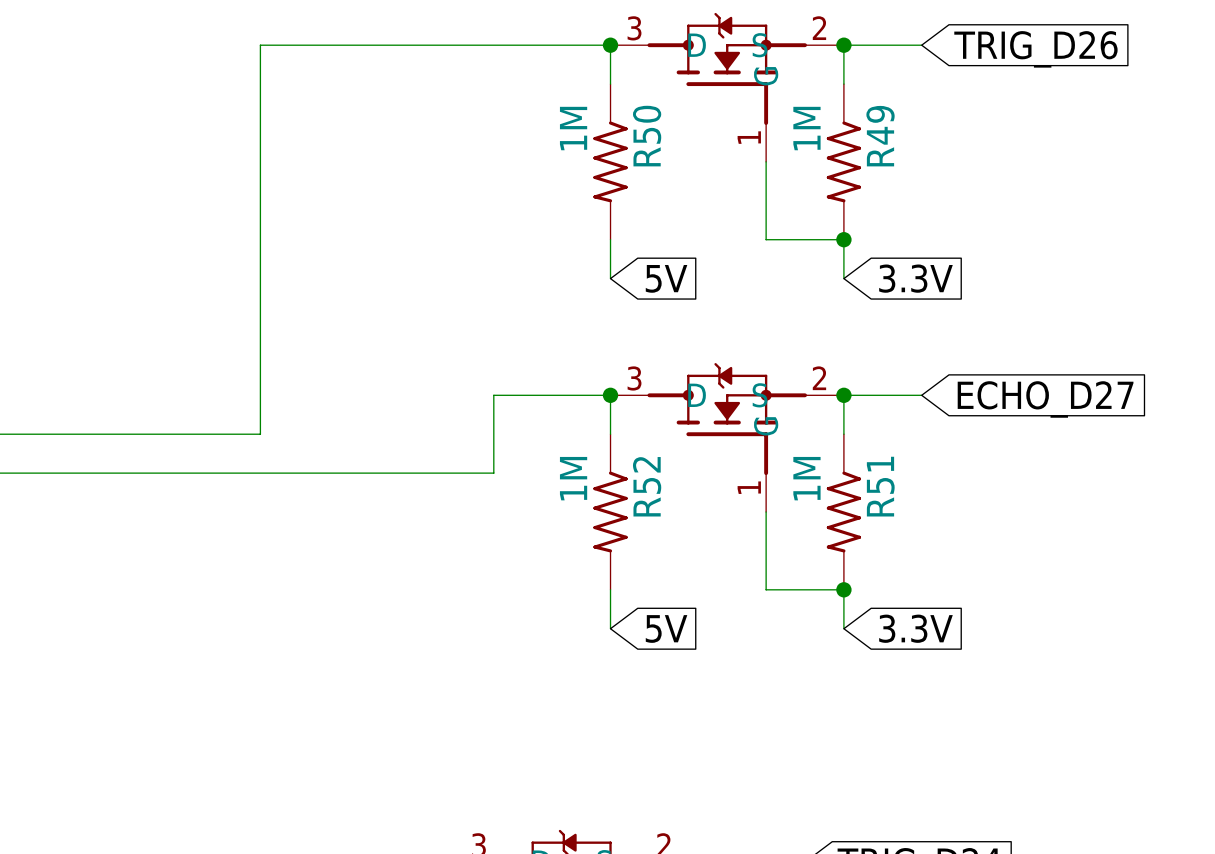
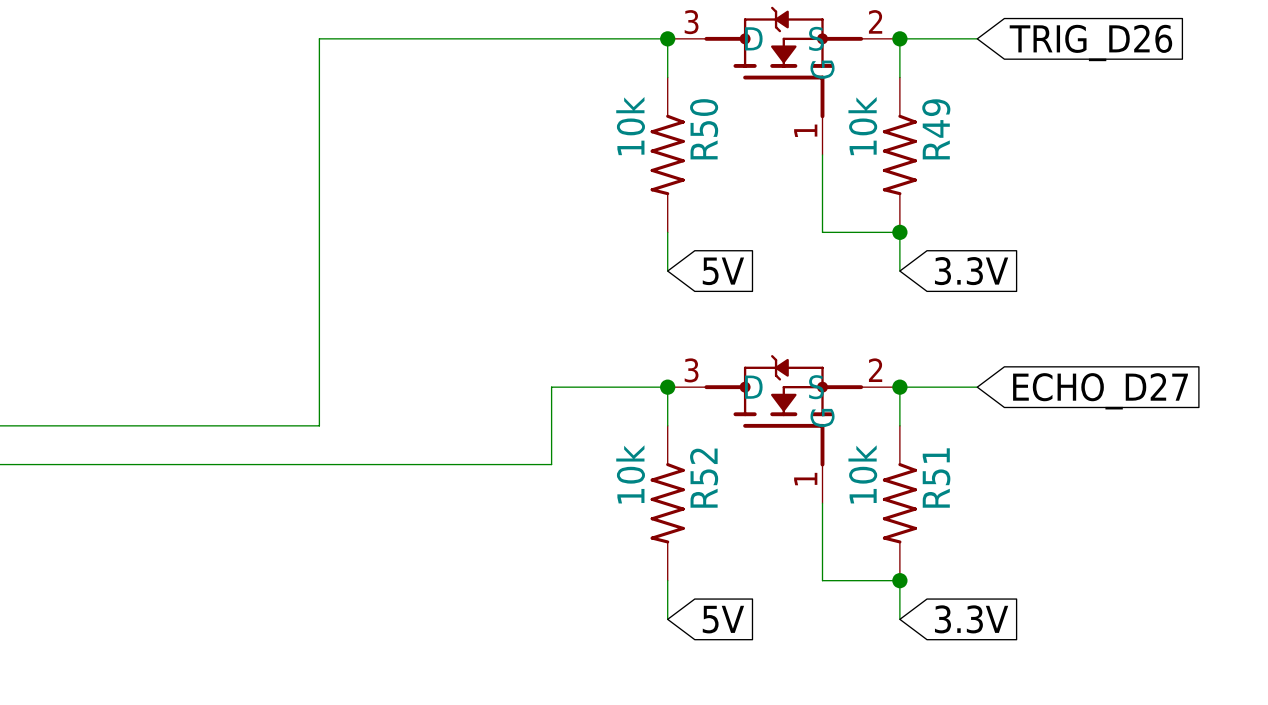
R50 value: 1M (573, 128) -> 10k (630, 126)
R49 value: 1M (806, 128) -> 10k (862, 126)
R52 value: 1M (573, 478) -> 10k (630, 474)
R51 value: 1M (806, 478) -> 10k (862, 474)

